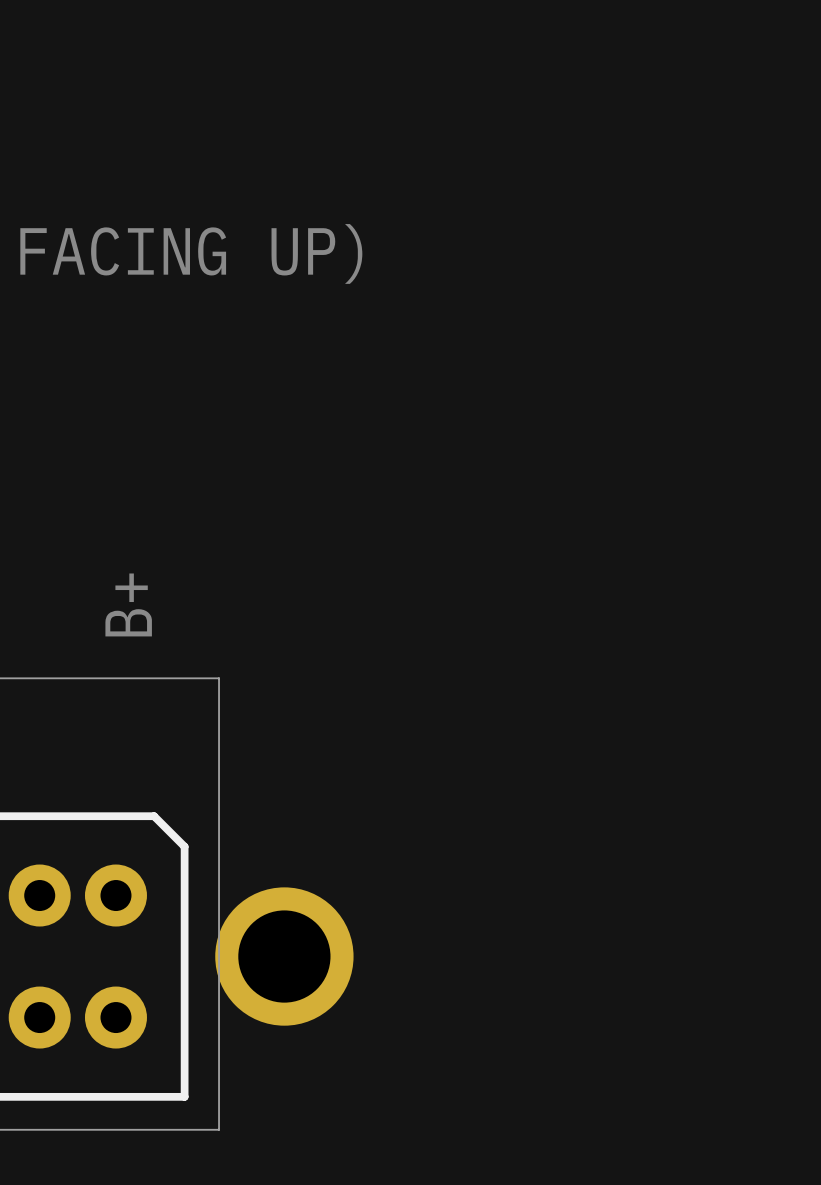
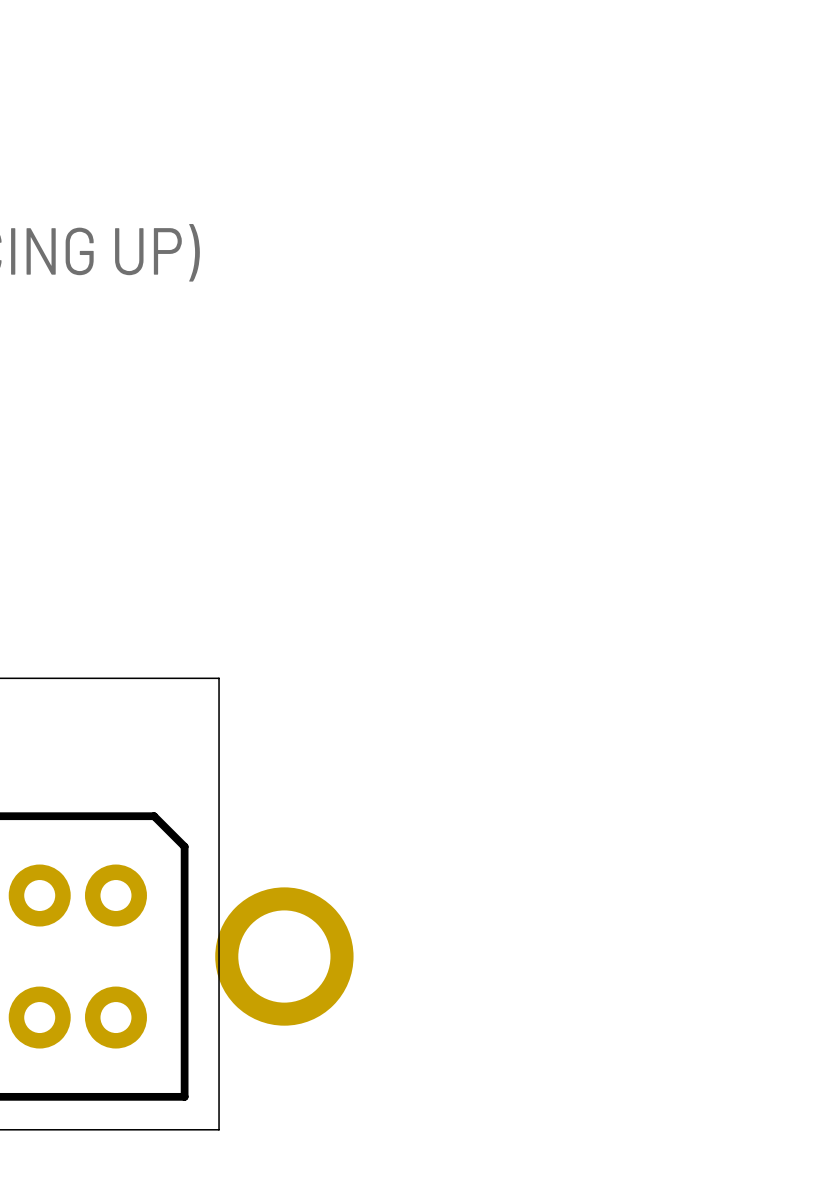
text: B+ (128, 604) -> none

